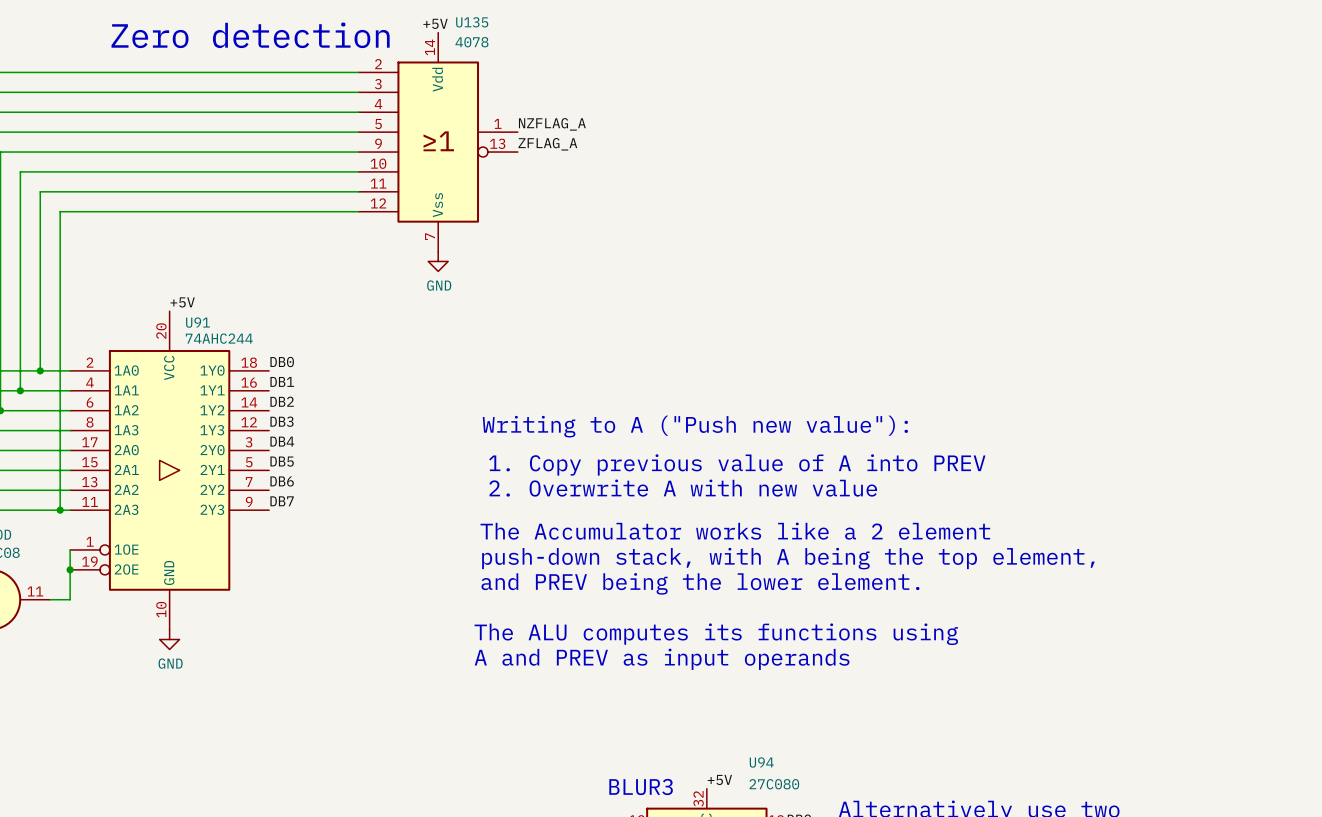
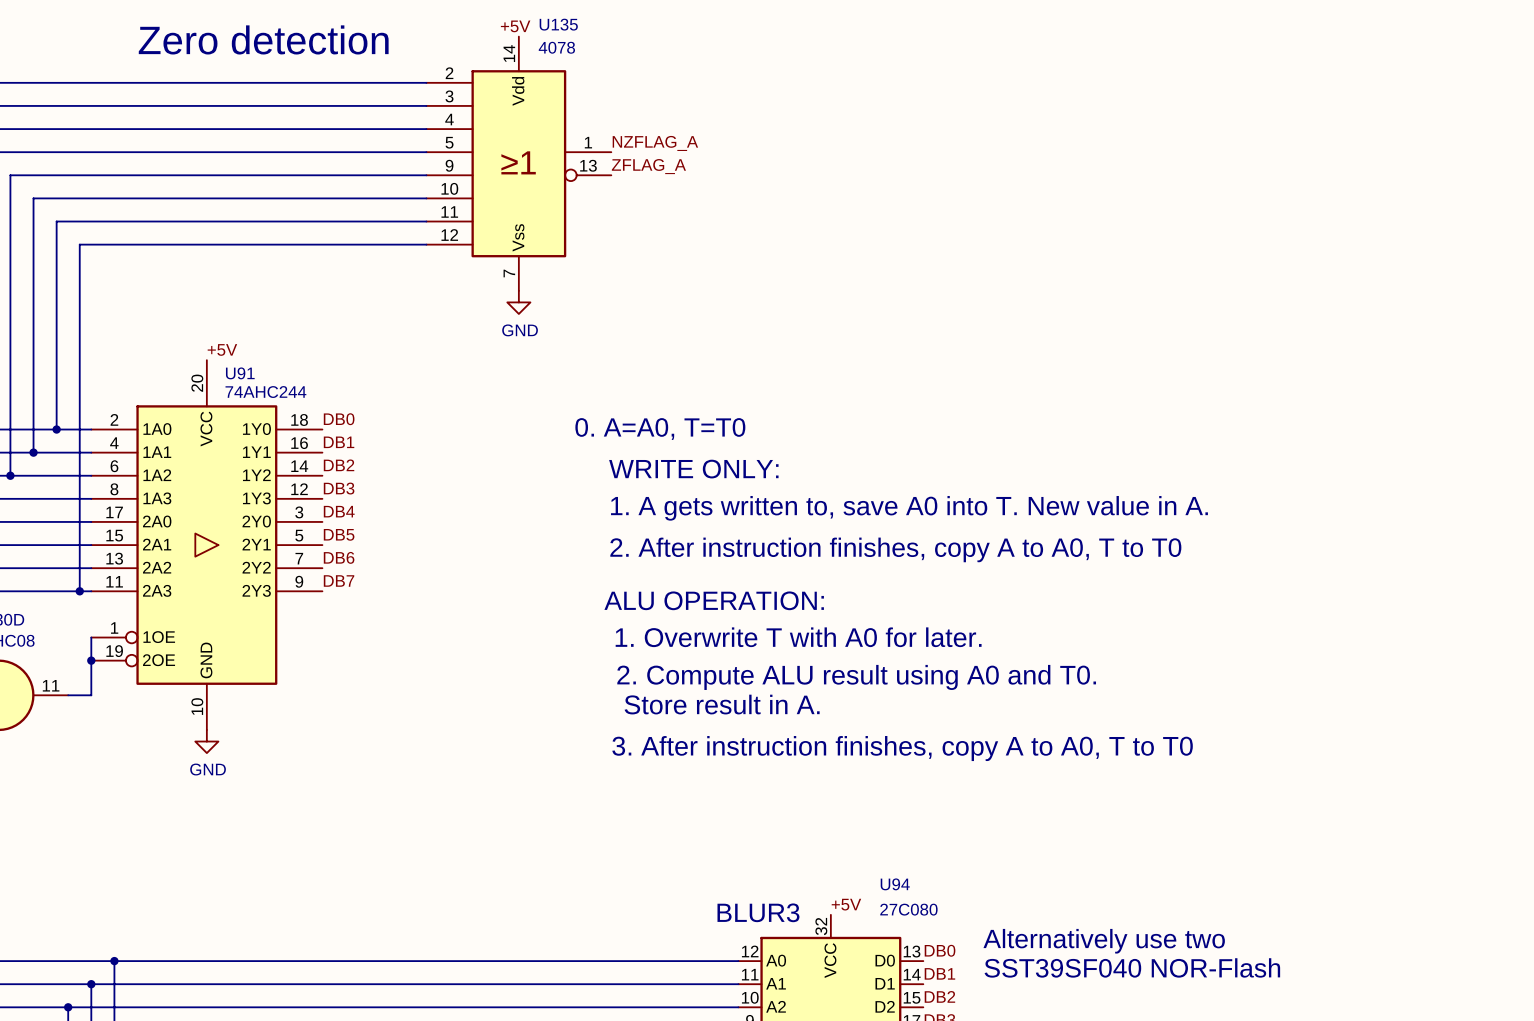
text: none -> 0. A=A0, T=T0 (660, 429)
text: none -> WRITE ONLY: (693, 469)
text: Writing to A ("Push new value"): (695, 426) -> none
text: none -> 1. A gets written to, save A0 into T. New value in A. (909, 508)
text: 1. Copy previous value of A into PREV (737, 464) -> none
text: none -> 2. After instruction finishes, copy A to A0, T to T0 (895, 549)
text: 2. Overwrite A with new value (683, 488) -> none
text: none -> ALU OPERATION: (714, 600)
text: The Accumulator works like a 2 element (735, 531) -> none
text: none -> 1. Overwrite T with A0 for later. (798, 637)
text: push-down stack, with A being the top element, (788, 558) -> none
text: and PREV being the lower element. (700, 583) -> none
text: none -> 2. Compute ALU result using A0 and T0. (856, 677)
text: none -> Store result in A. (722, 704)
text: The ALU computes its functions using (716, 634) -> none
text: none -> 3. After instruction finishes, copy A to A0, T to T0 (902, 748)
text: A and PREV as input operands (662, 659) -> none

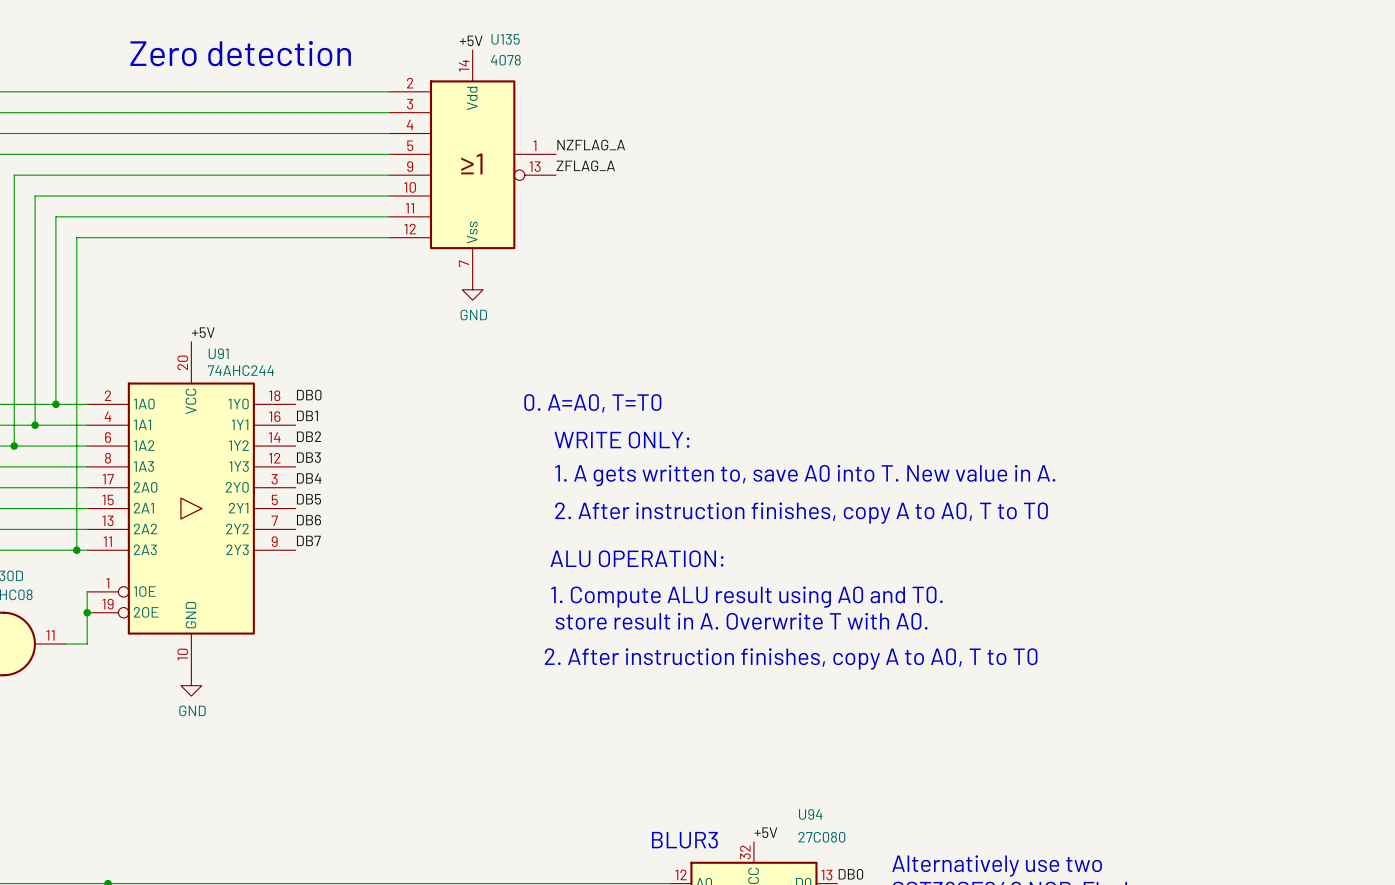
text: 1. Overwrite T with A0 for later. (798, 637) -> none
text: none -> store result in A. Overwrite T with A0. (741, 621)
text: 2. Compute ALU result using A0 and T0. (856, 677) -> 1. Compute ALU result using A0 and T0. (746, 597)
text: Store result in A. (722, 704) -> none
text: 3. After instruction finishes, copy A to A0, T to T0 (902, 748) -> 2. After instruction finishes, copy A to A0, T to T0 (791, 658)

